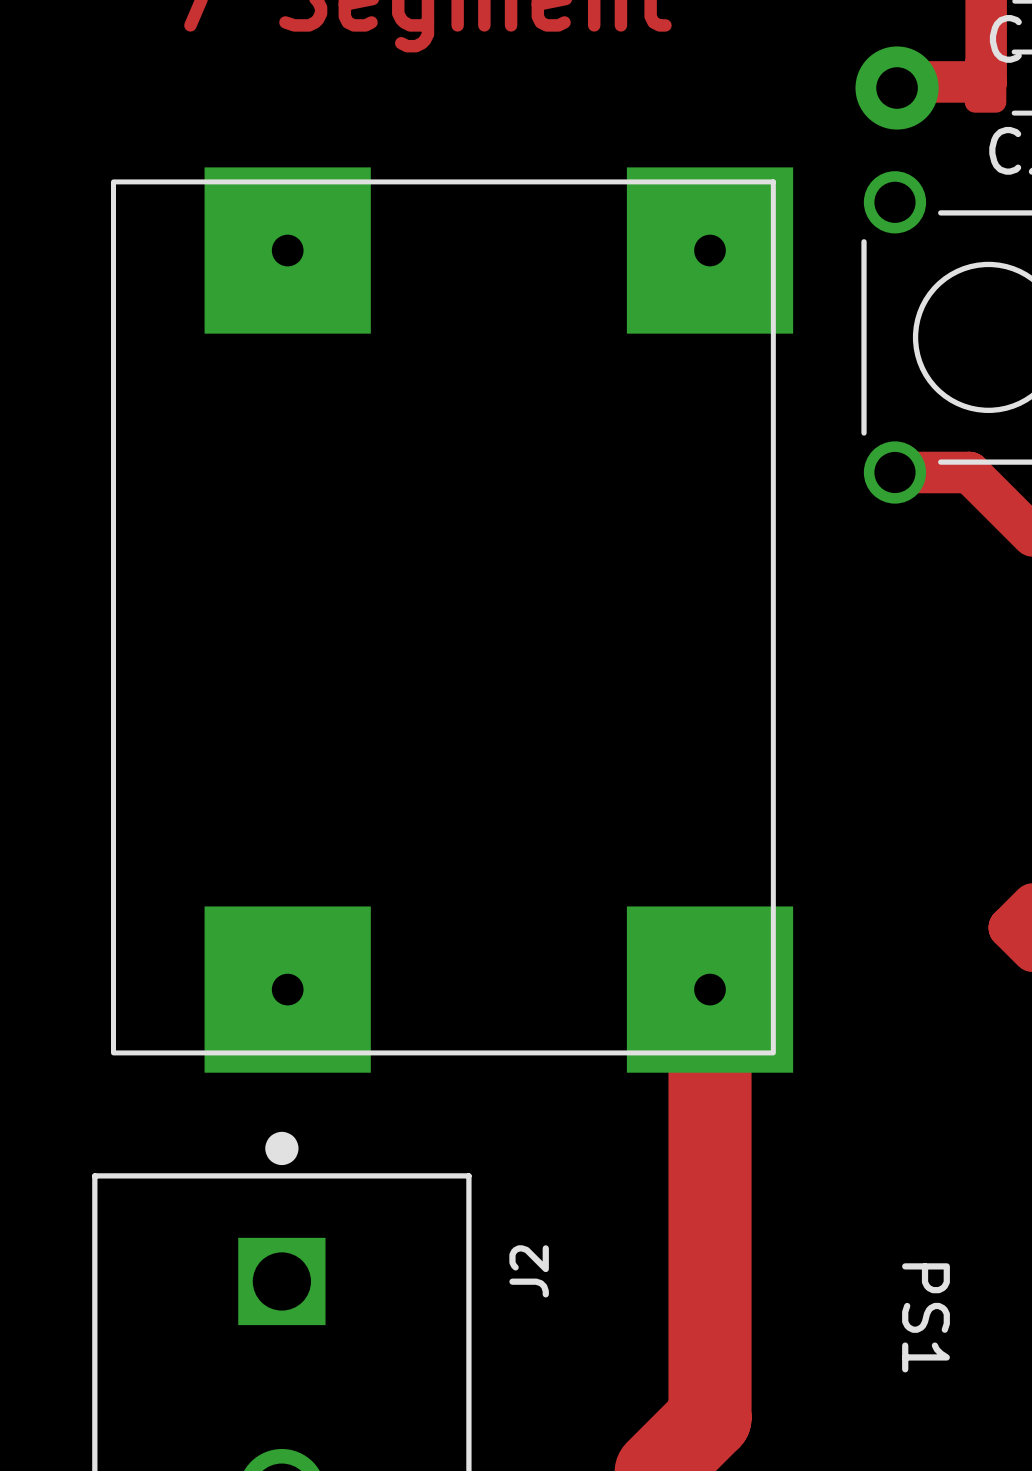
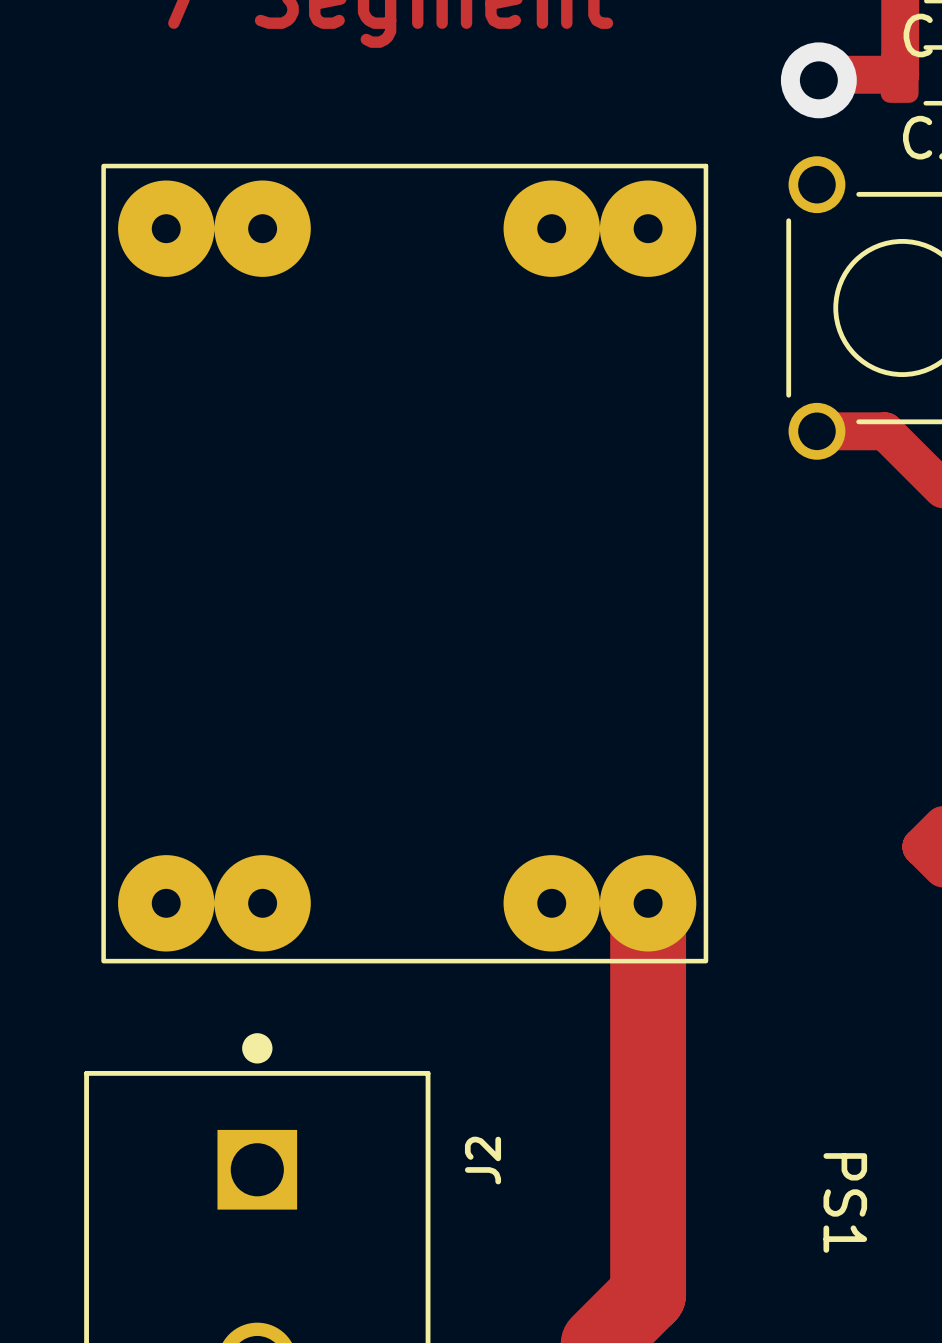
PS1 footprint: [111, 167, 794, 1073] -> [101, 163, 709, 964]

